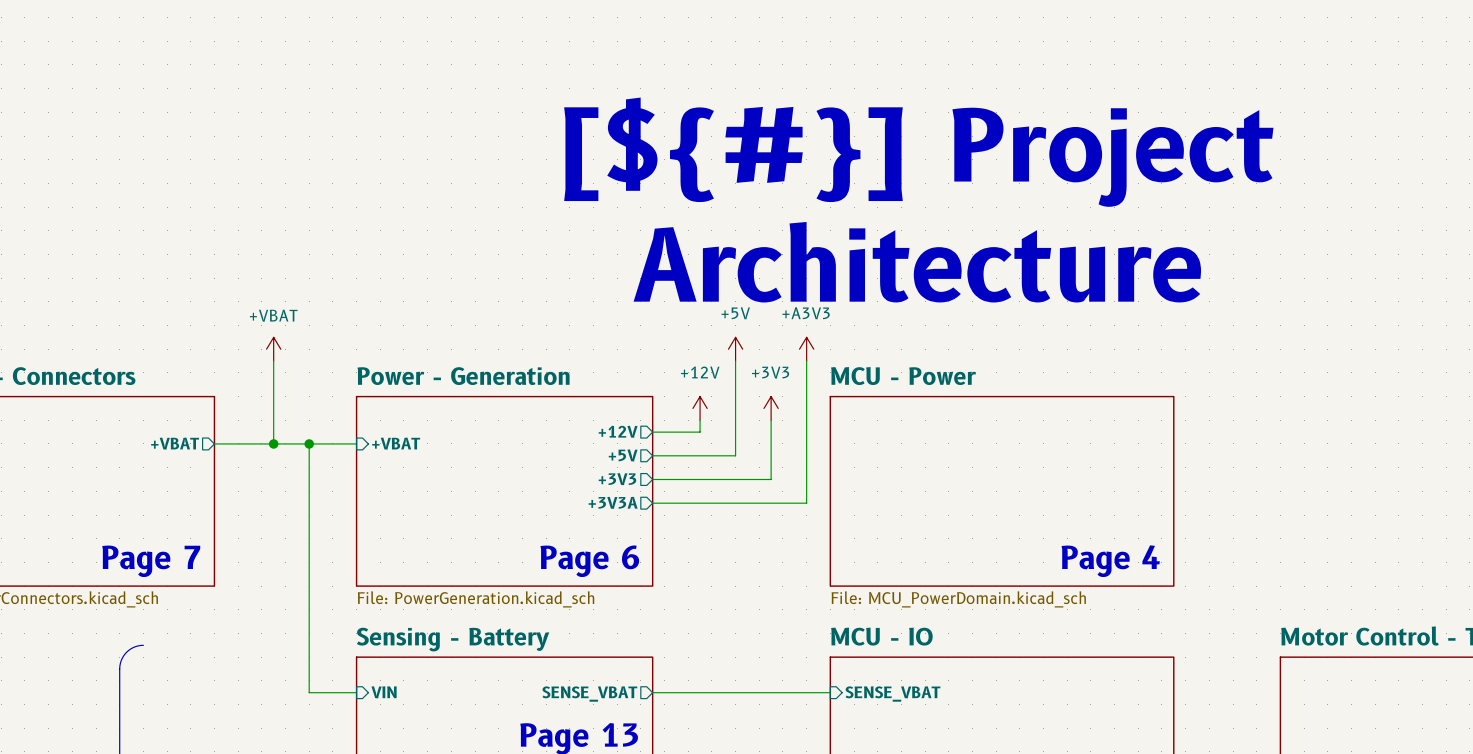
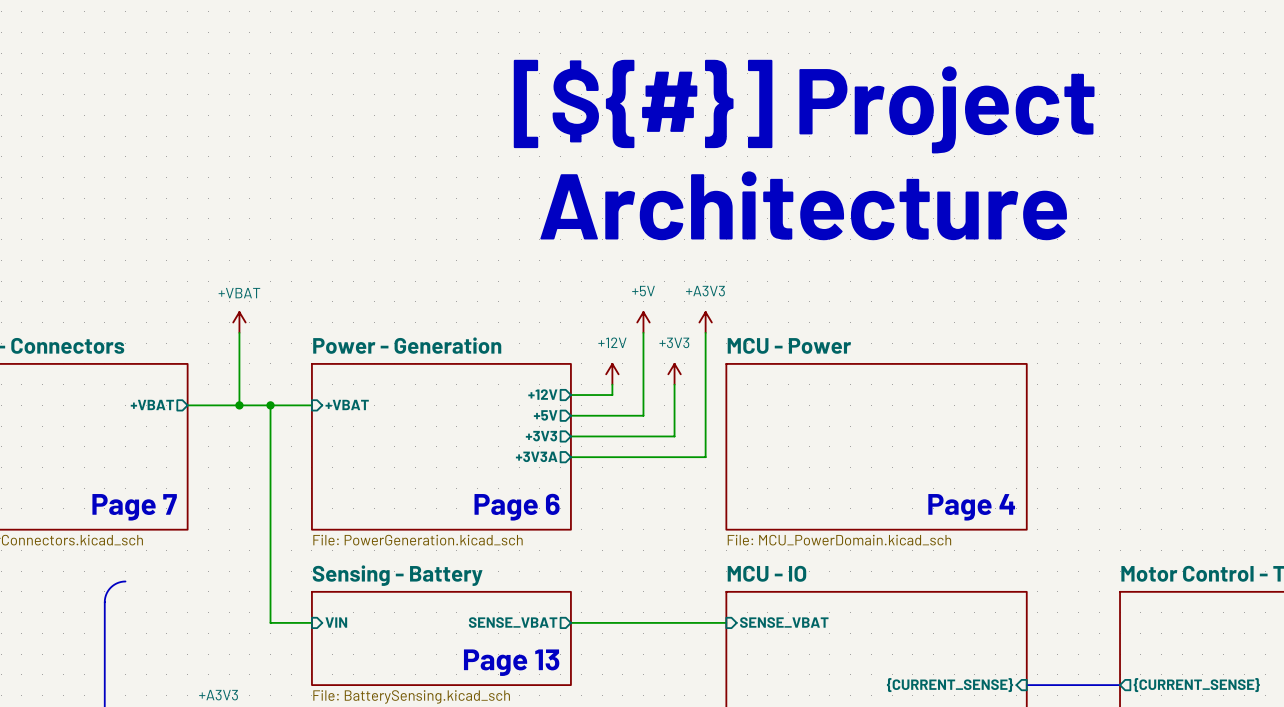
text position: [${#}] Project (918, 152) -> [${#}] Project (804, 106)
text position: Architecture (917, 262) -> Architecture (803, 205)

